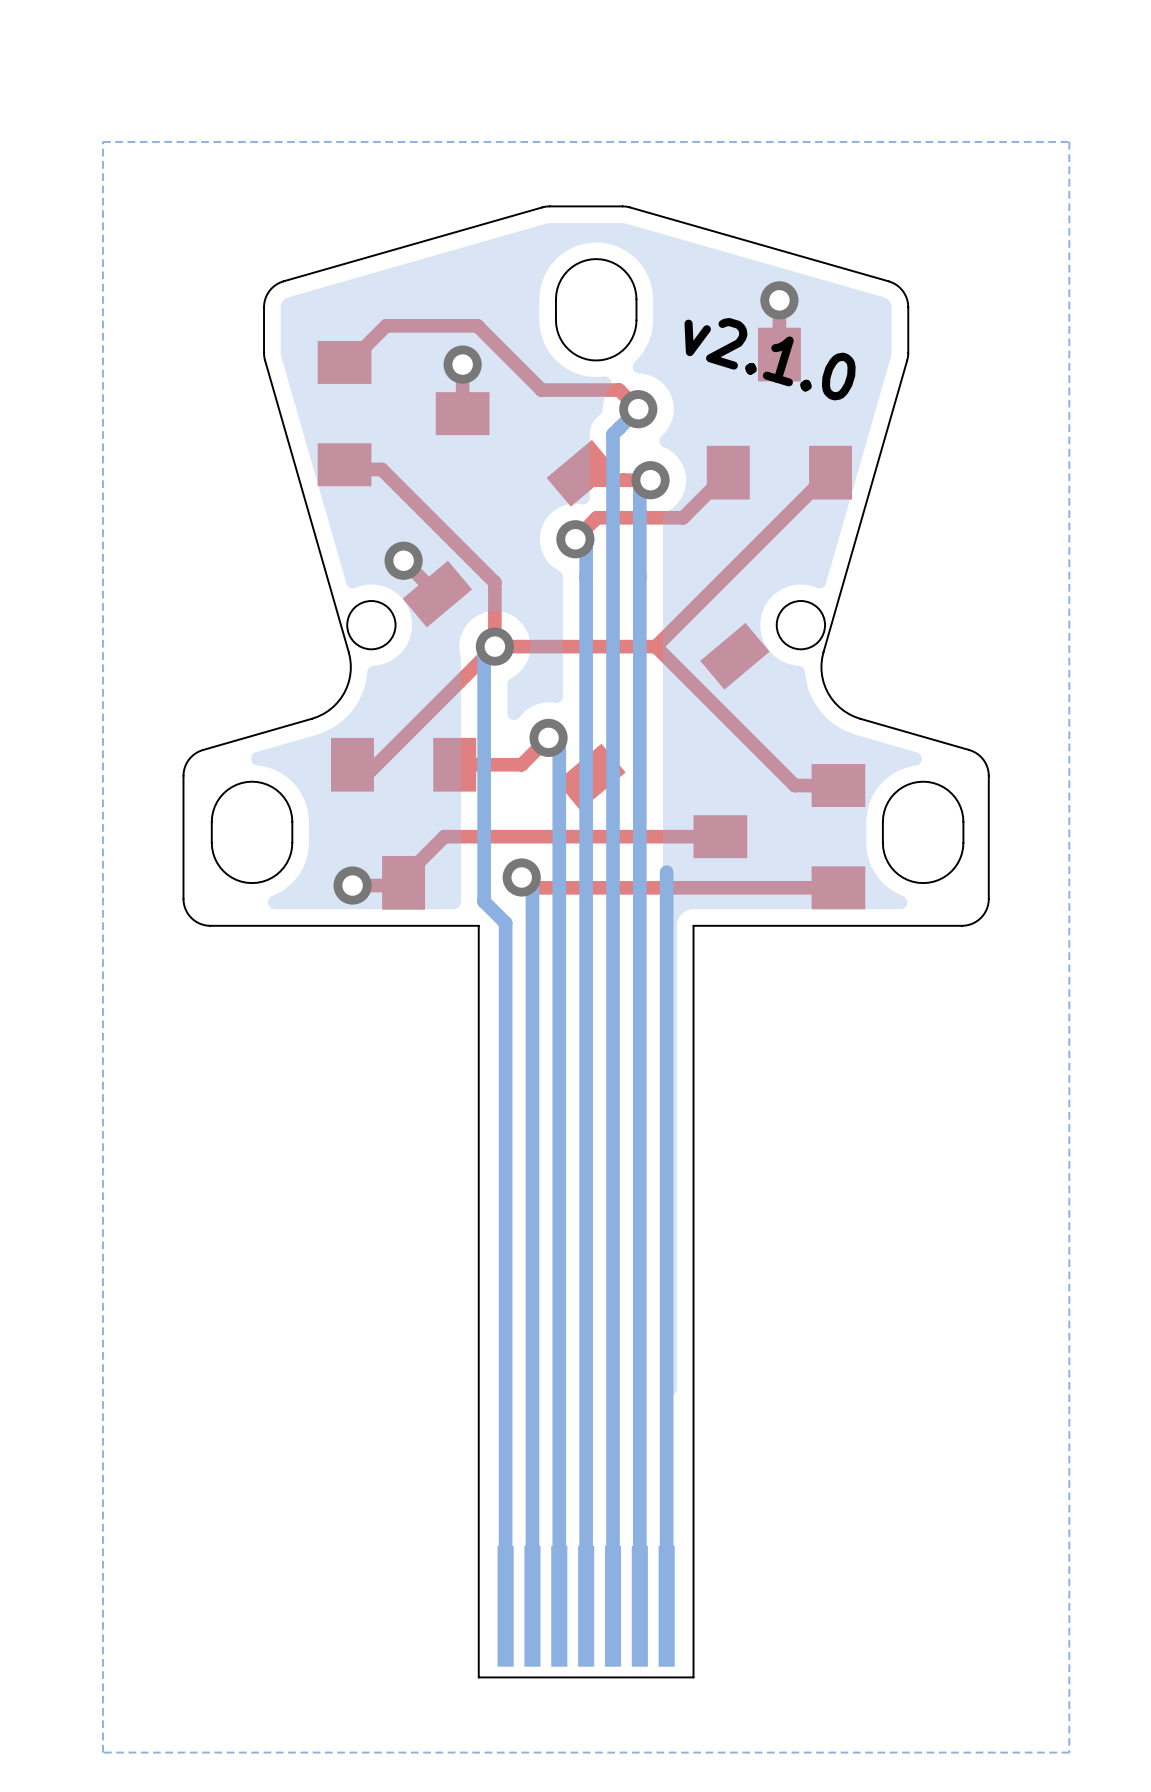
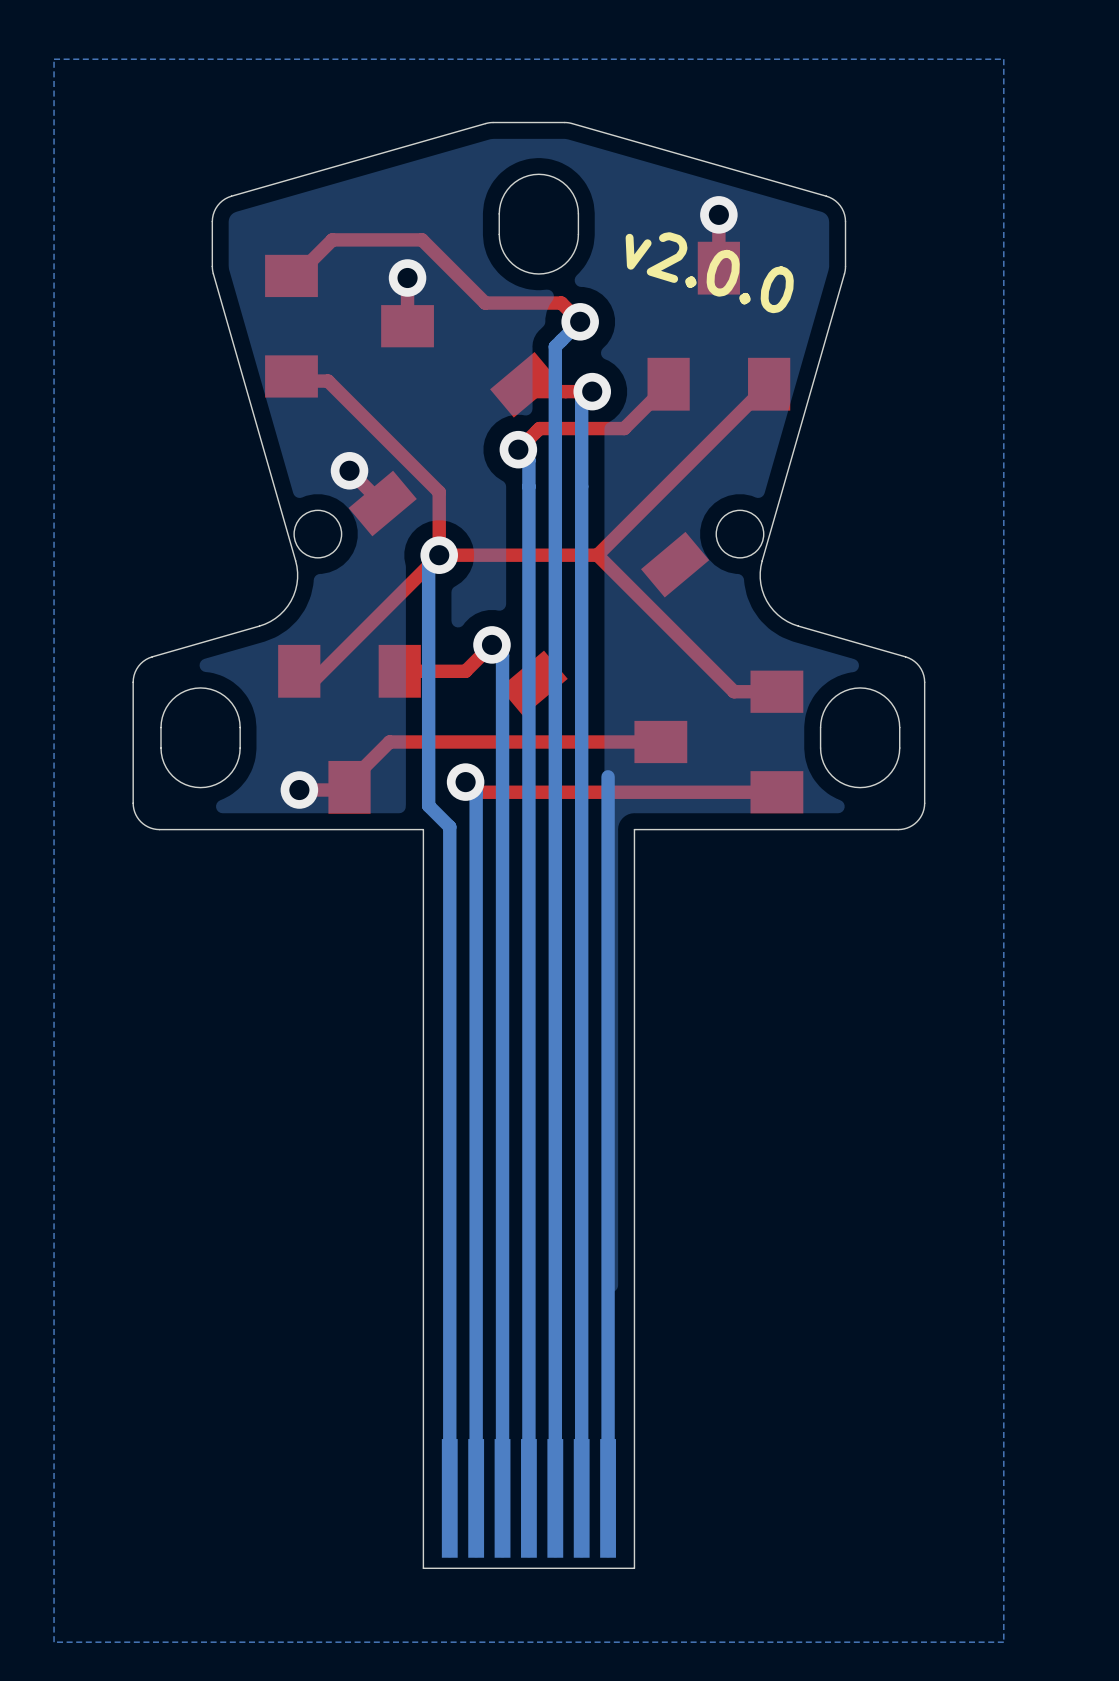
text: v2.1.0 (770, 359) -> v2.0.0 (709, 272)

